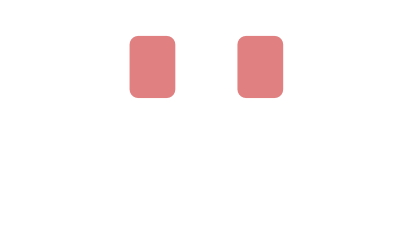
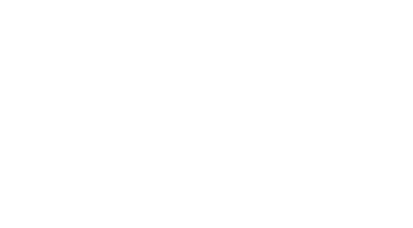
part: (206, 66) -> none

